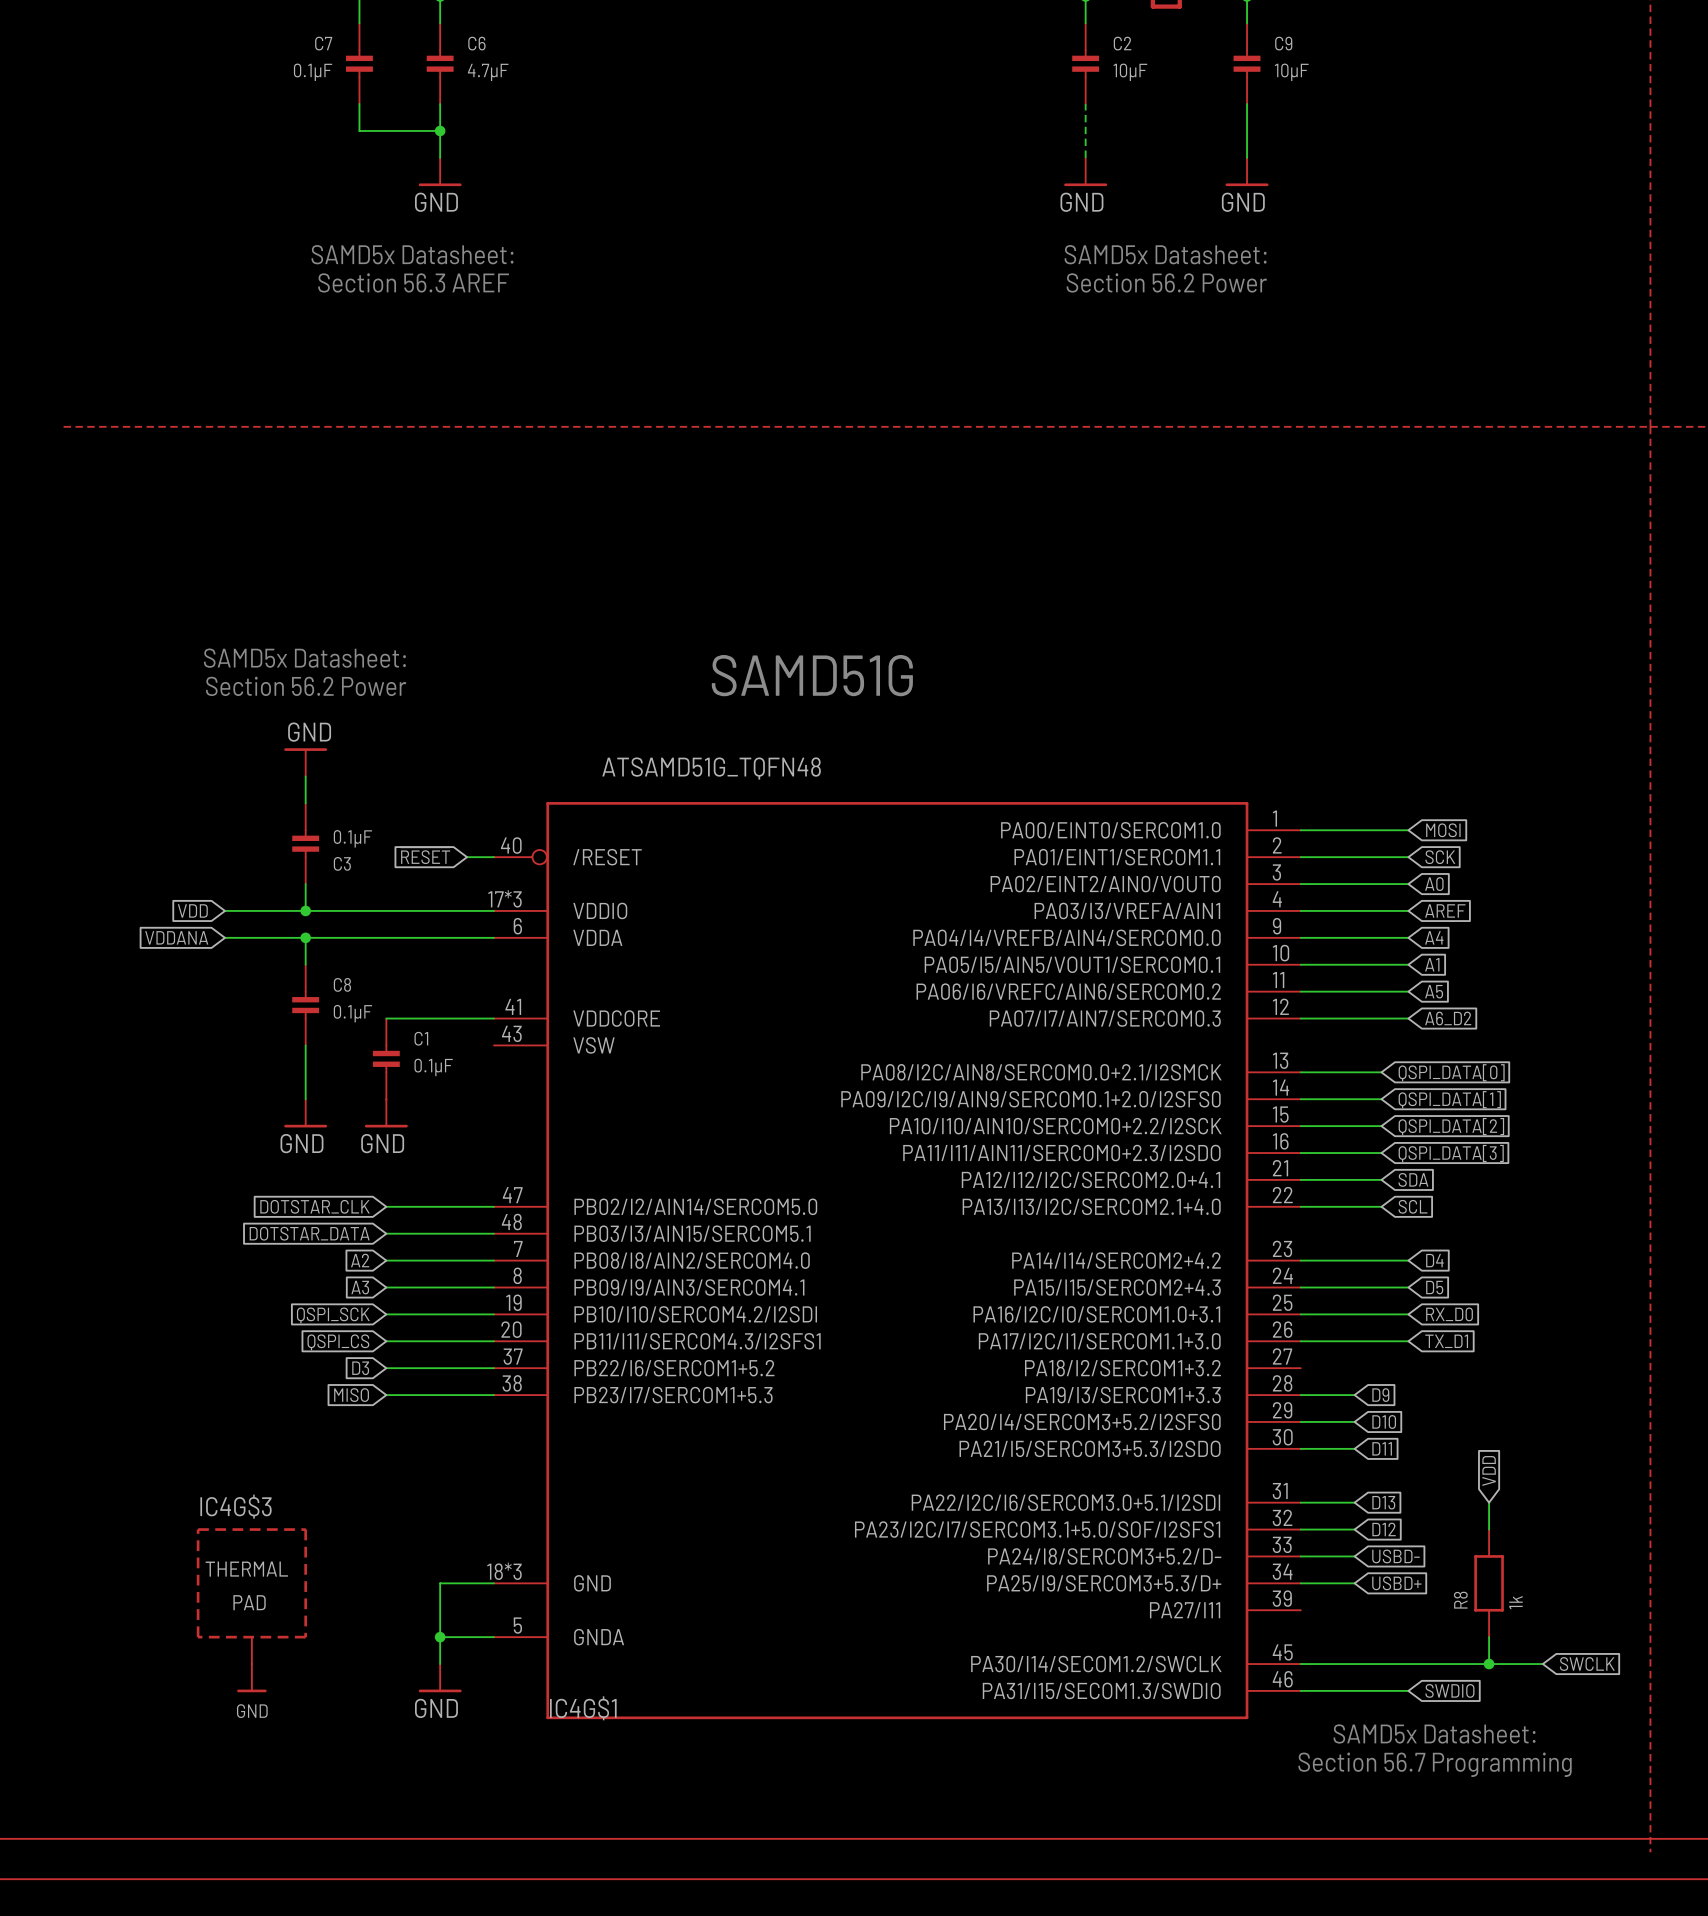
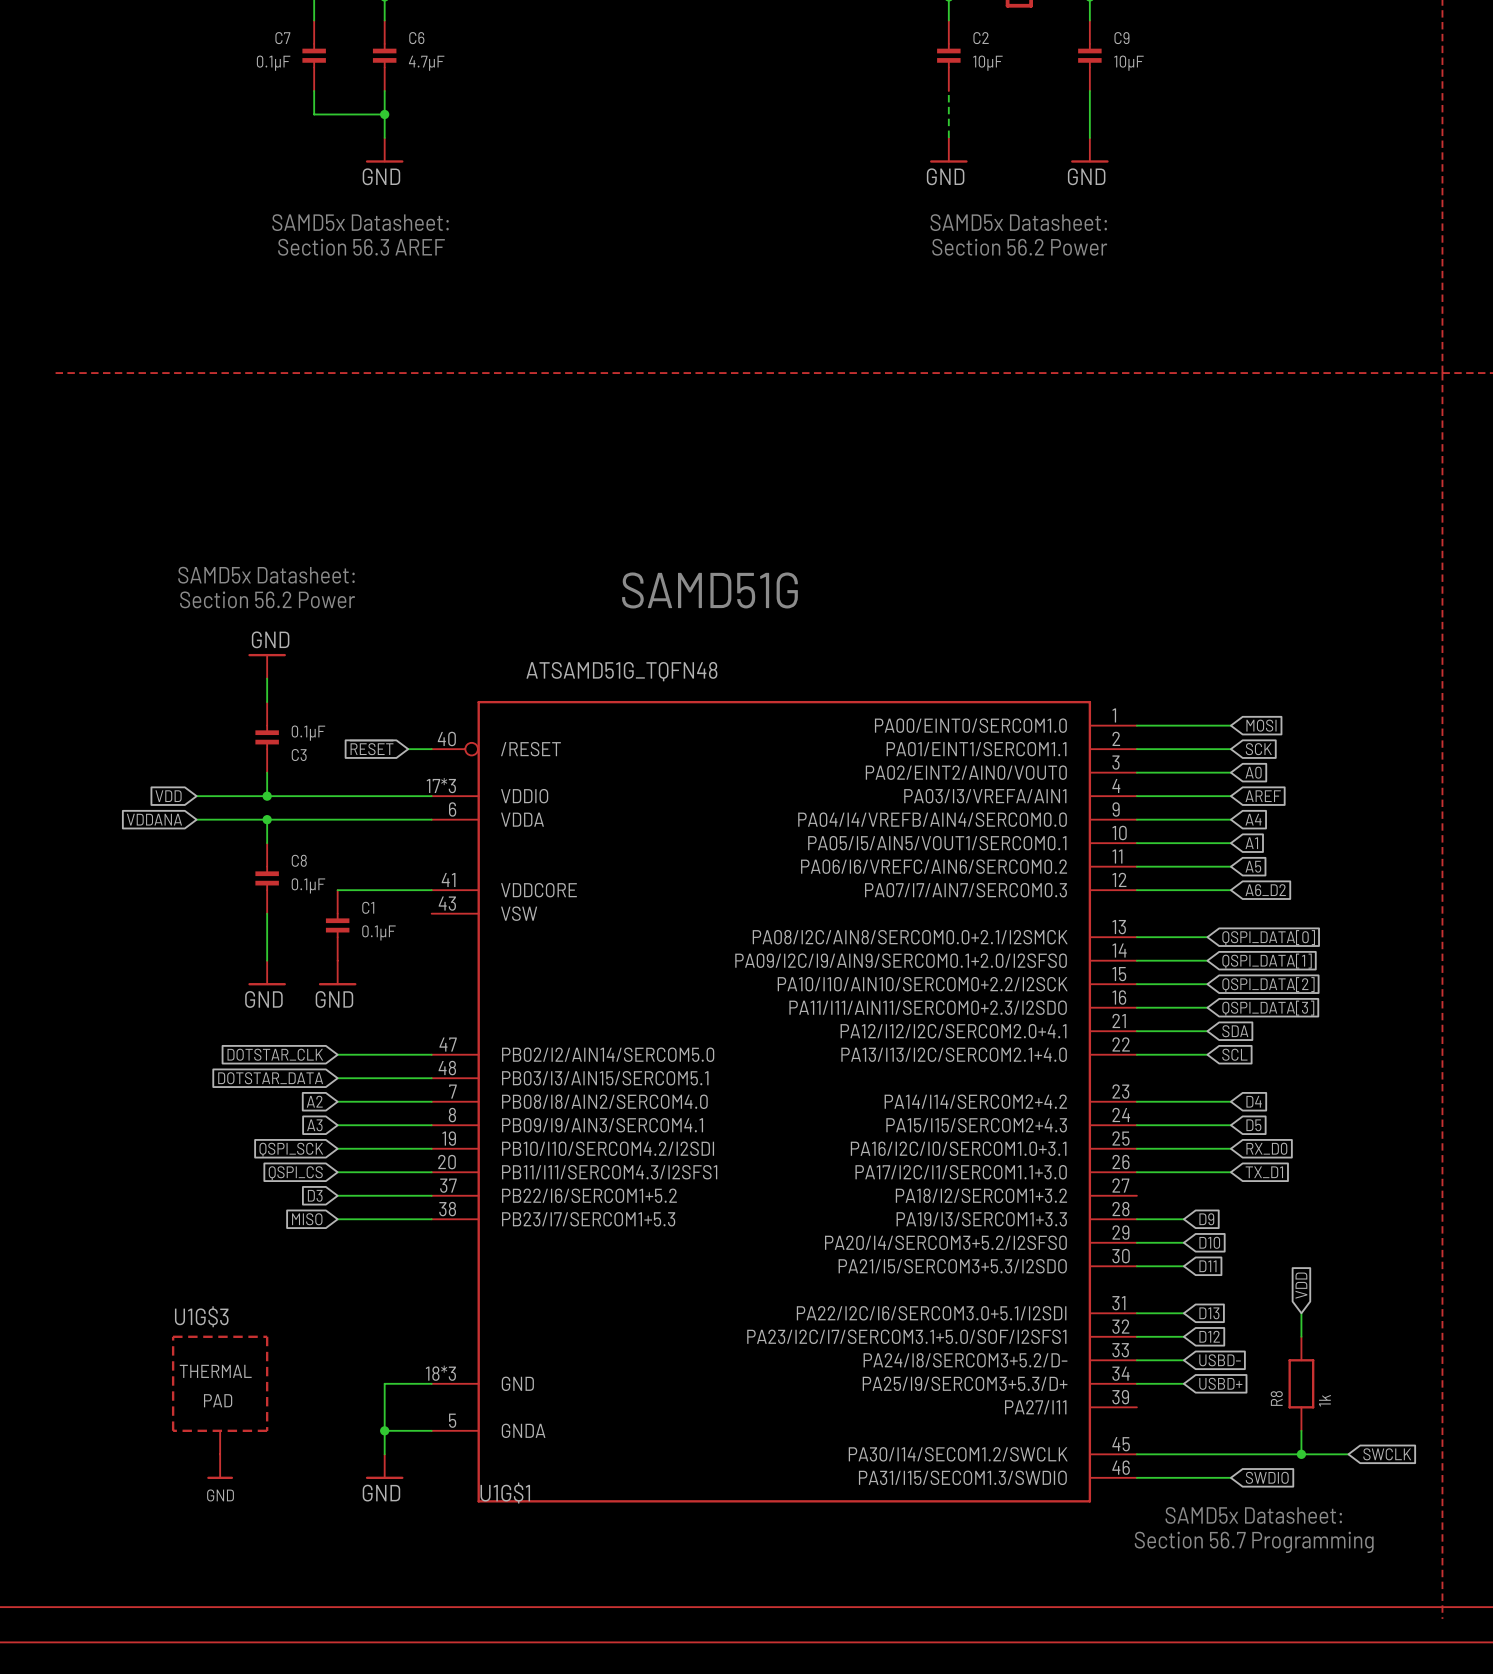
IC4G$3 name: IC4G$3 (236, 1506) -> U1G$3 (201, 1316)
IC4G$1 name: IC4G$1 (583, 1708) -> U1G$1 (505, 1493)

